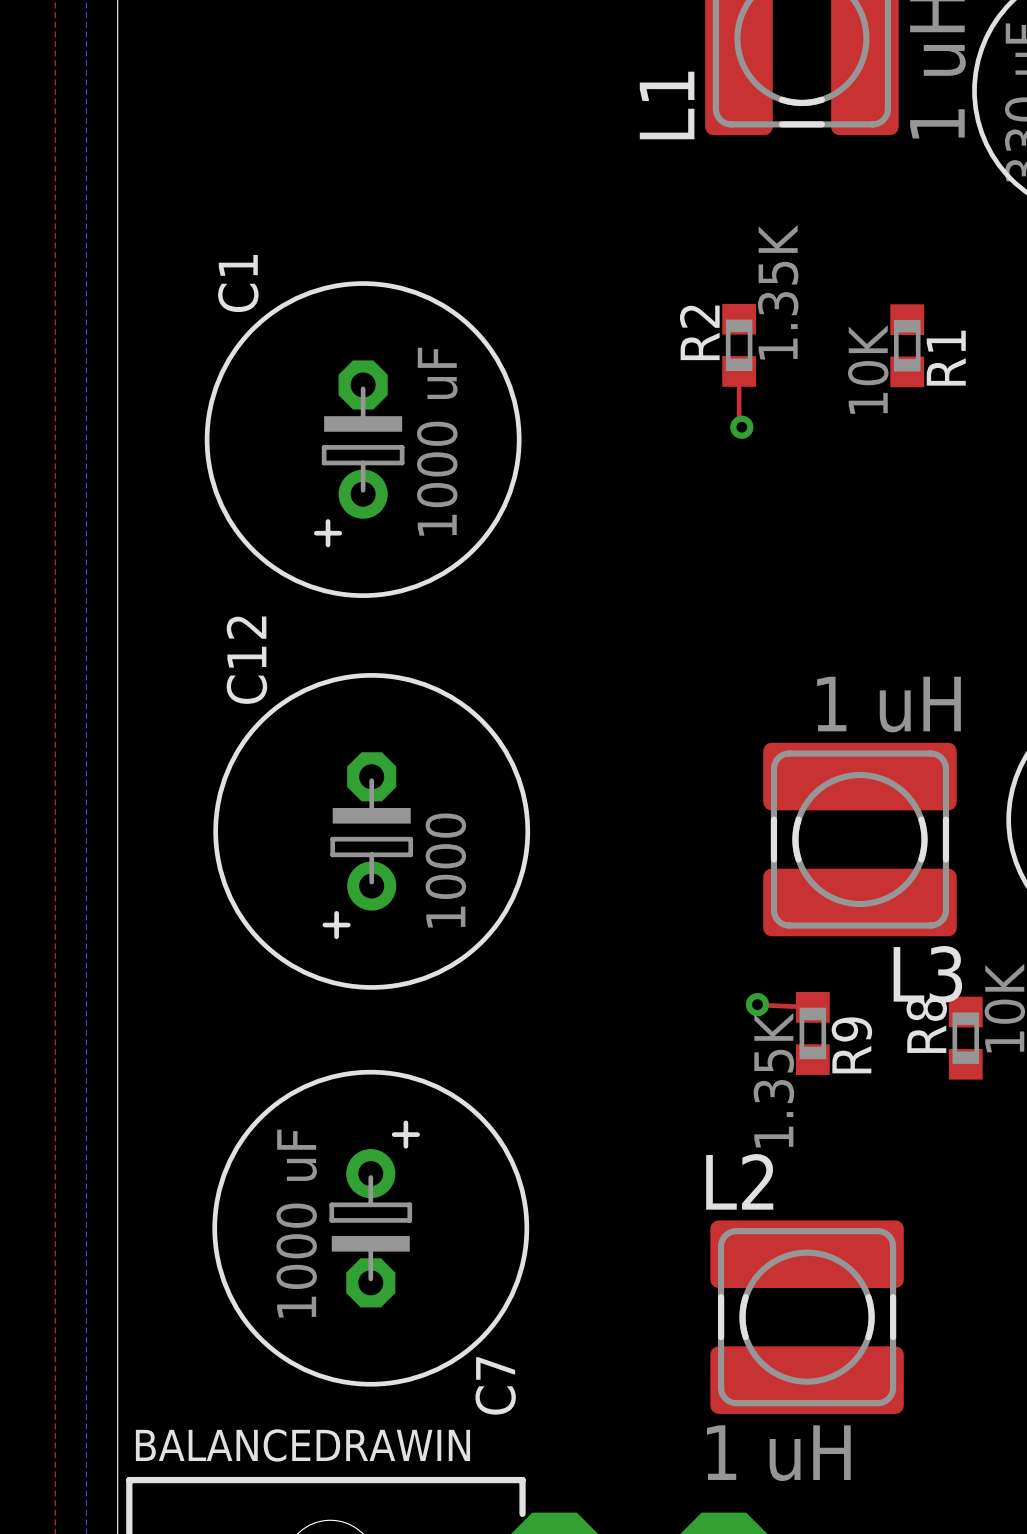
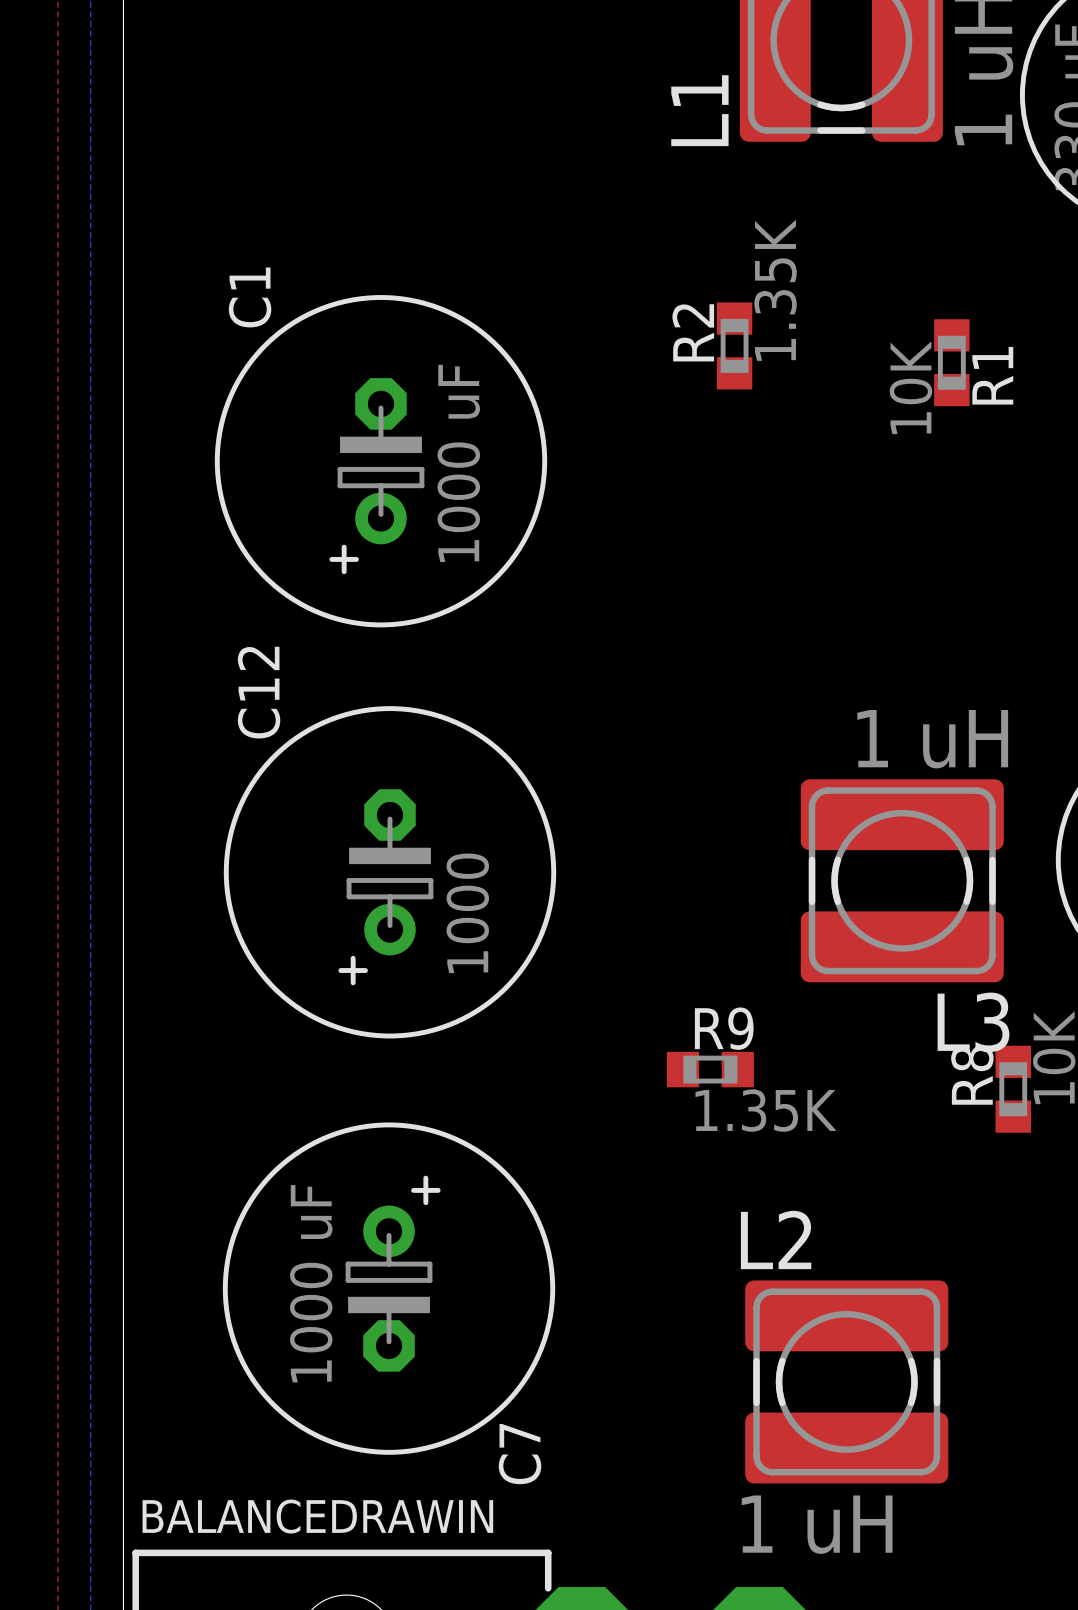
R2 position: (739, 345) -> (734, 345)
top track: (739, 371) (739, 427) (741, 427) -> none
via: (741, 427) -> none
top track: (757, 1004) (812, 1007) -> none
via: (757, 1004) -> none
R9 rotation: 0° (812, 1033) -> 90° clockwise (710, 1069)
R9 position: (812, 1033) -> (710, 1069)
R9 name position: R9 (851, 1045) -> R9 (724, 1028)
R9 value position: 1.35K (773, 1080) -> 1.35K (766, 1110)

